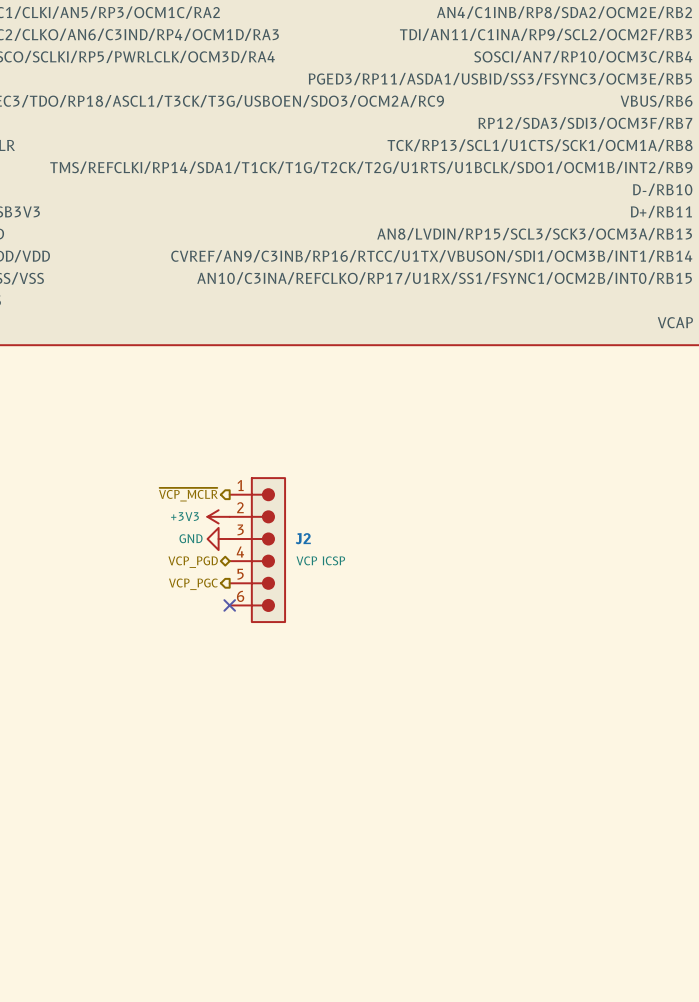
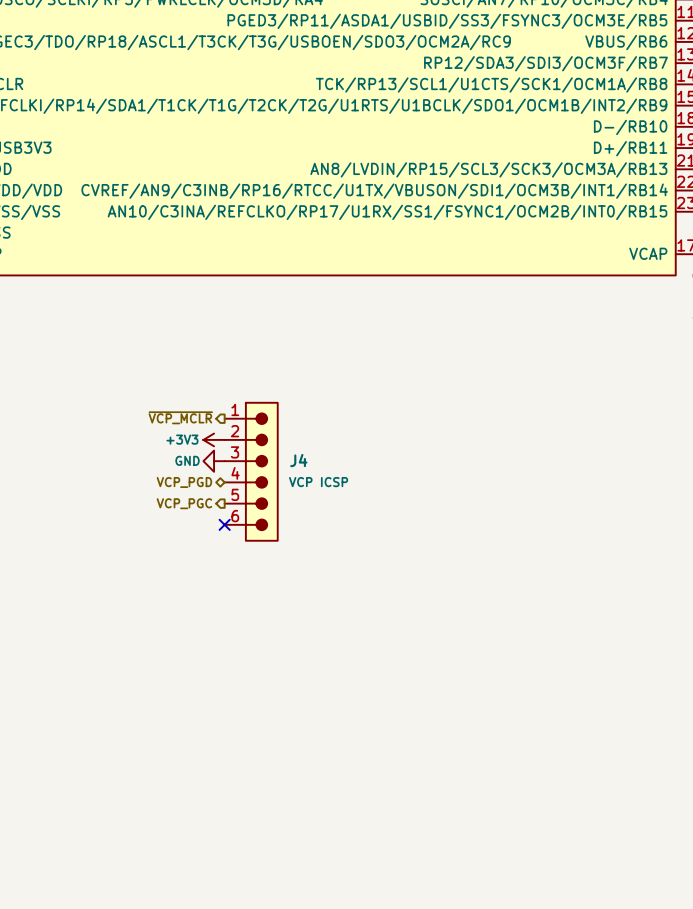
J2 name: J2 (303, 538) -> J4 (298, 460)

